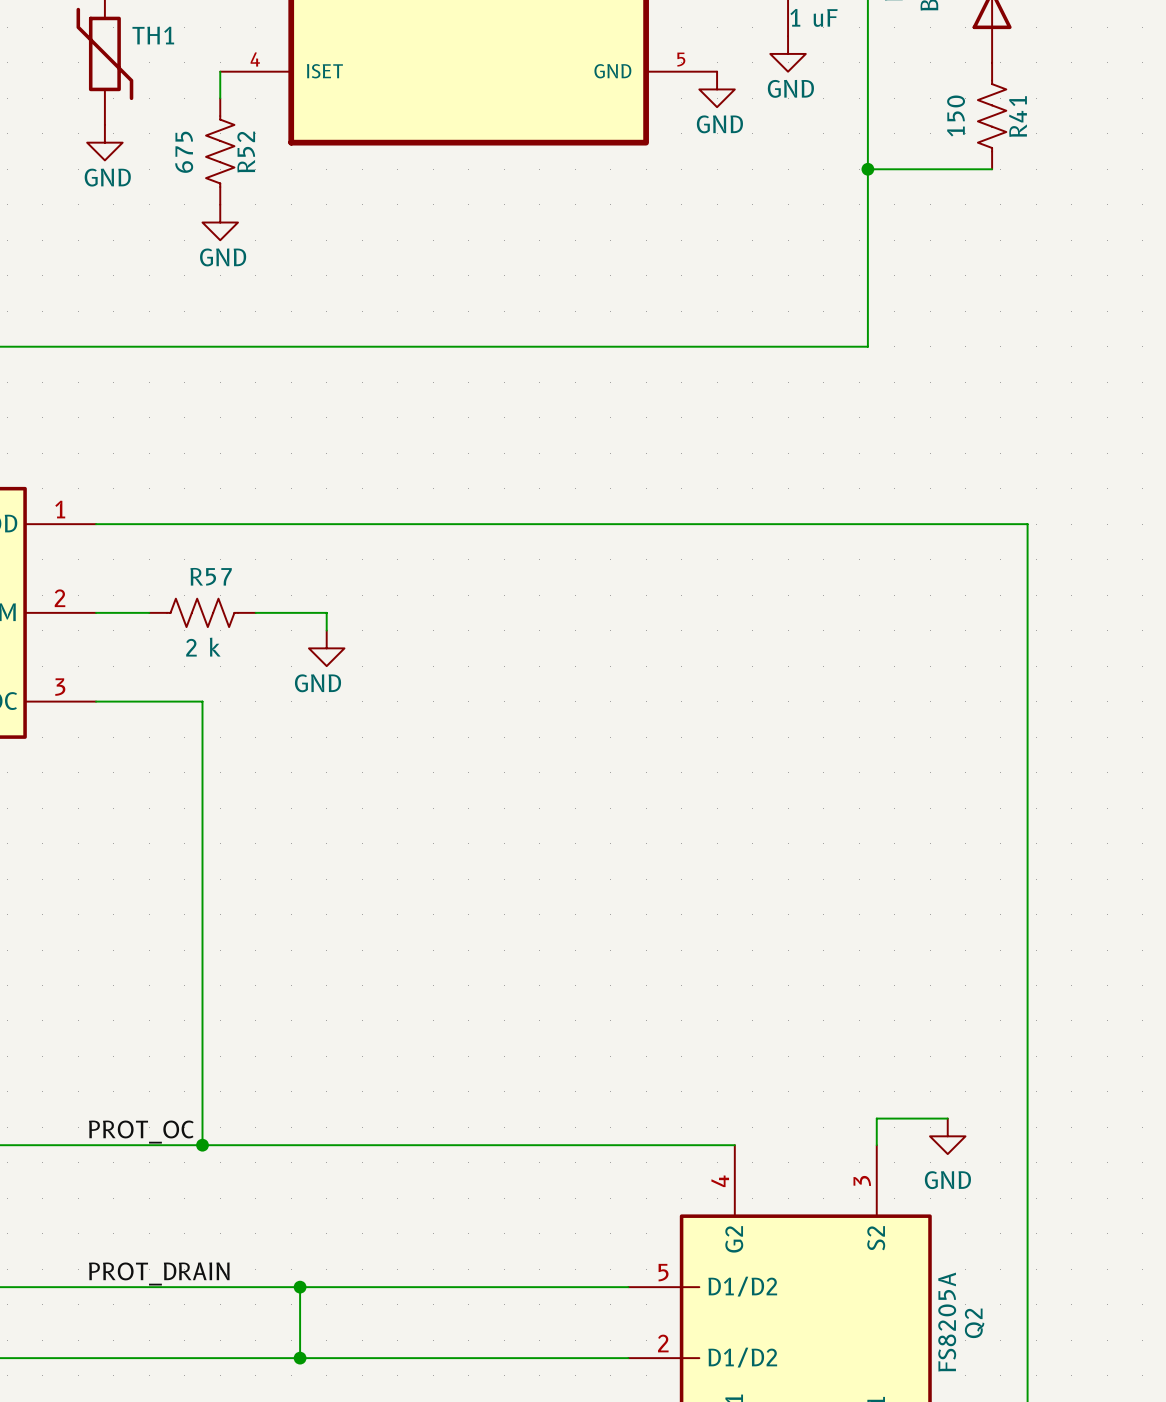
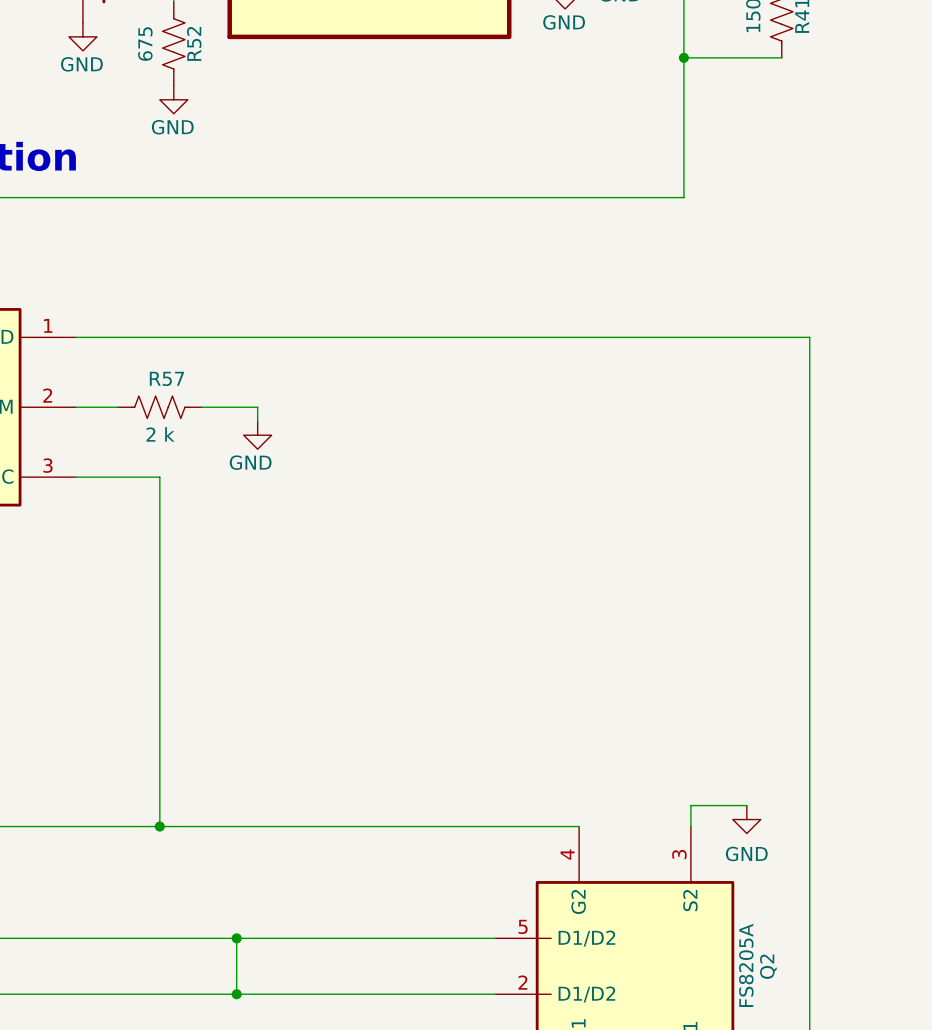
label: PROT_OC (141, 1132) -> none
label: PROT_DRAIN (159, 1273) -> none

